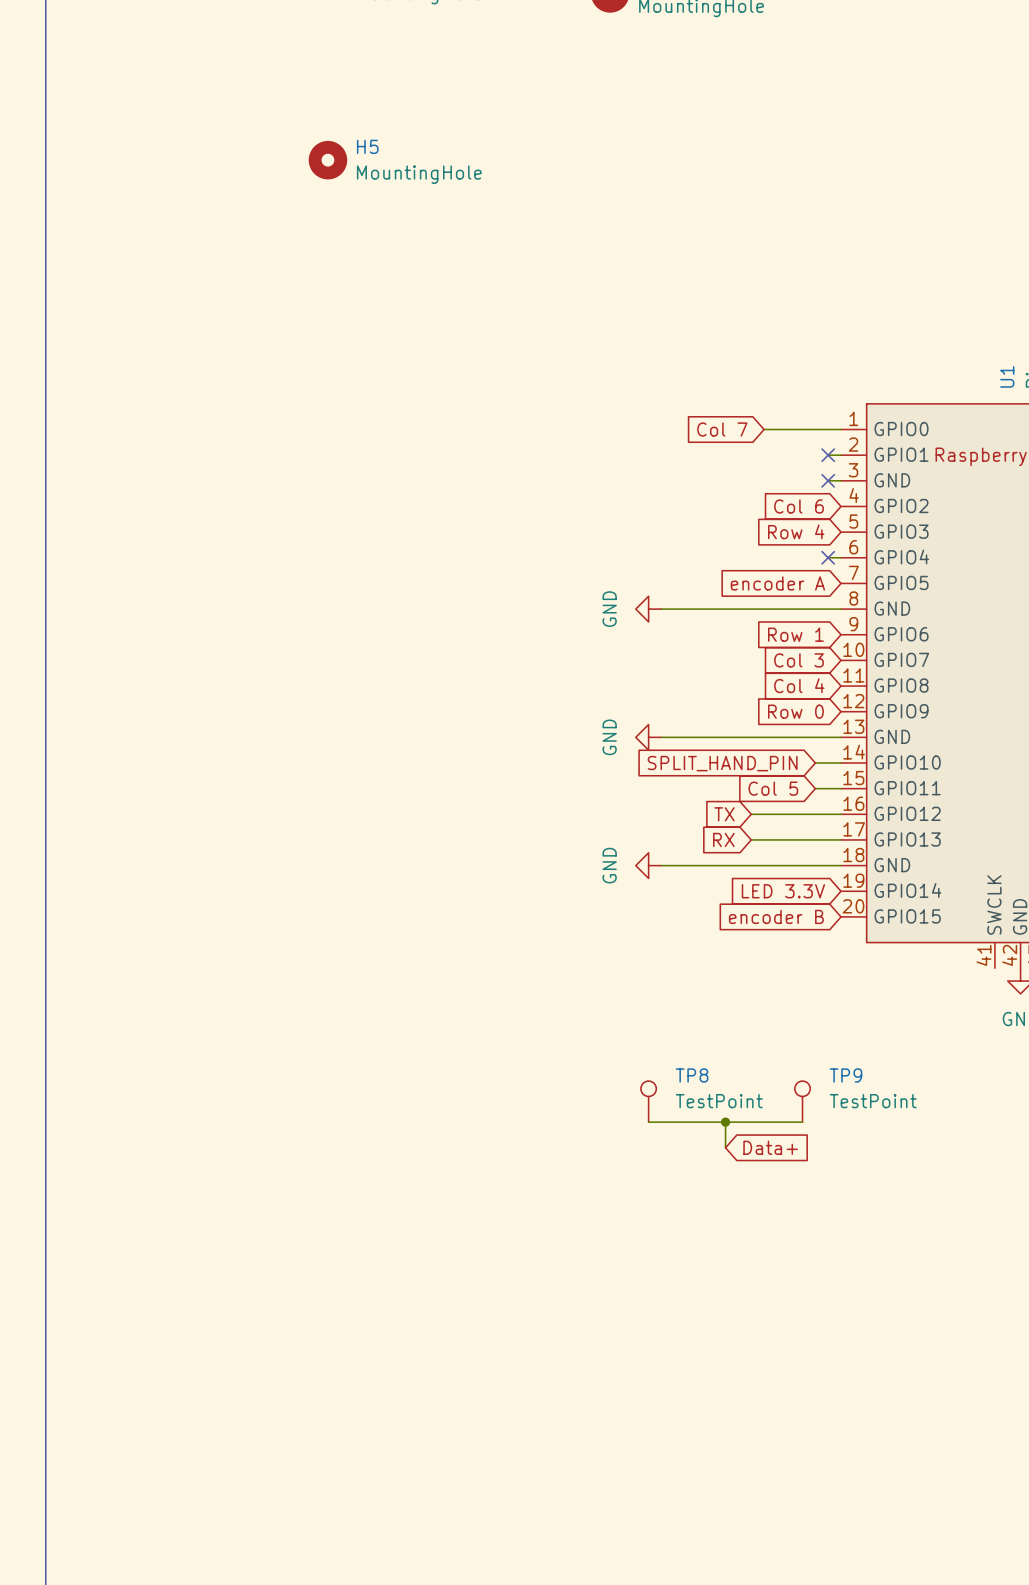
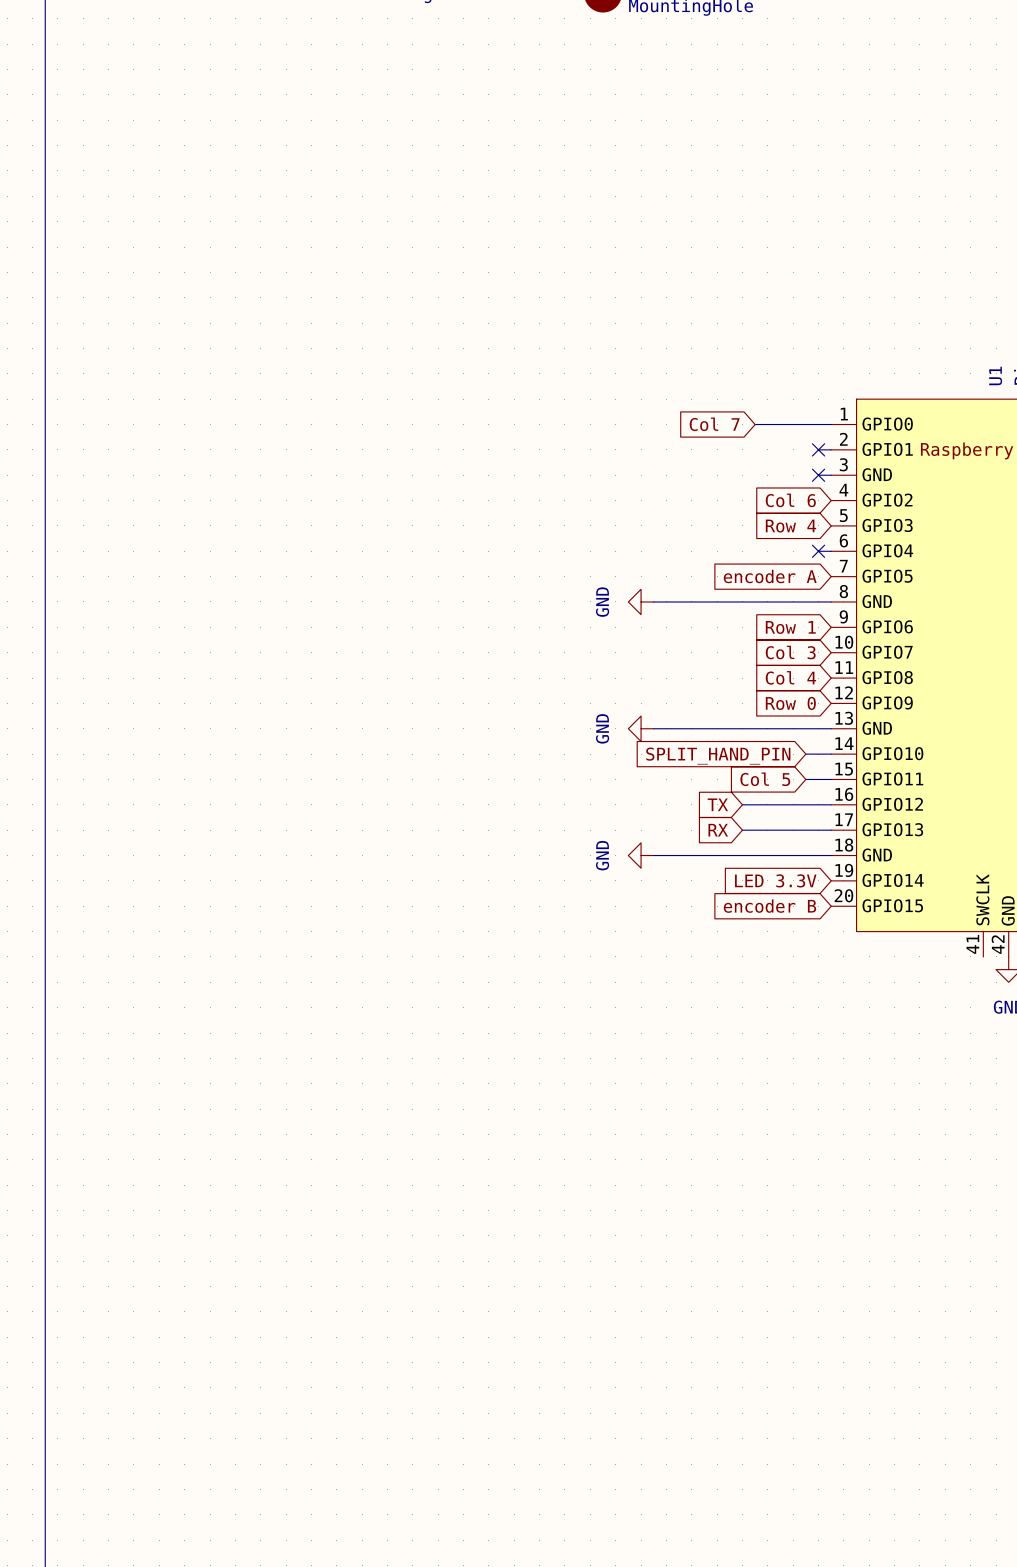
H5: MountingHole (327, 160) -> none
TP8: TestPoint (648, 1101) -> none
TP9: TestPoint (802, 1101) -> none
wire: (648, 1122) (802, 1122) -> none
wire: (725, 1122) (725, 1147) -> none
junction: (725, 1122) -> none
global label: Data+ (770, 1147) -> none

